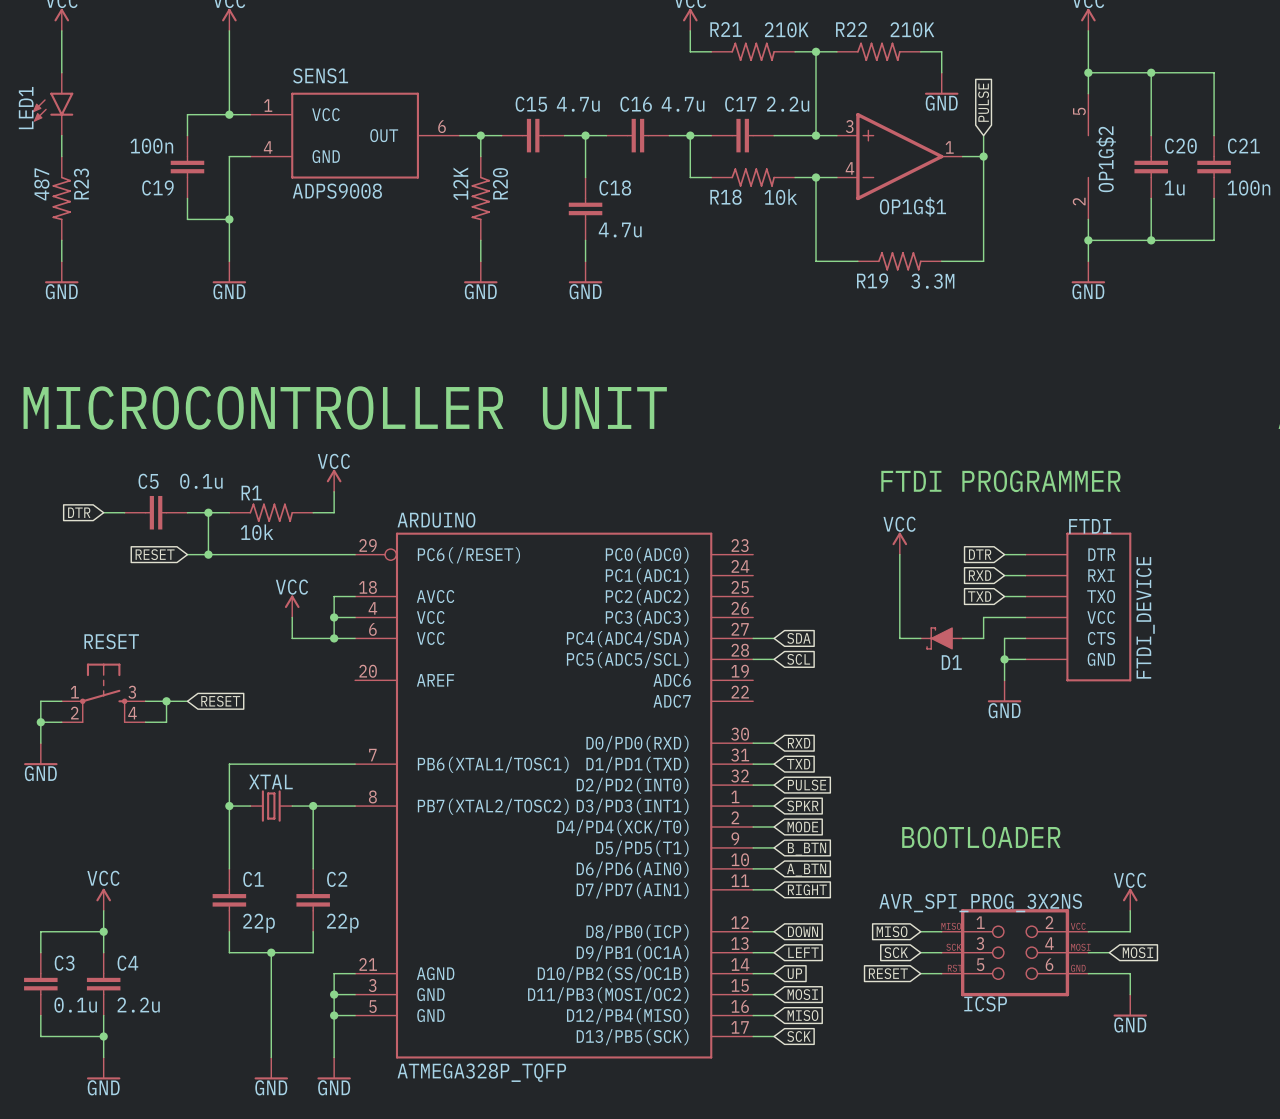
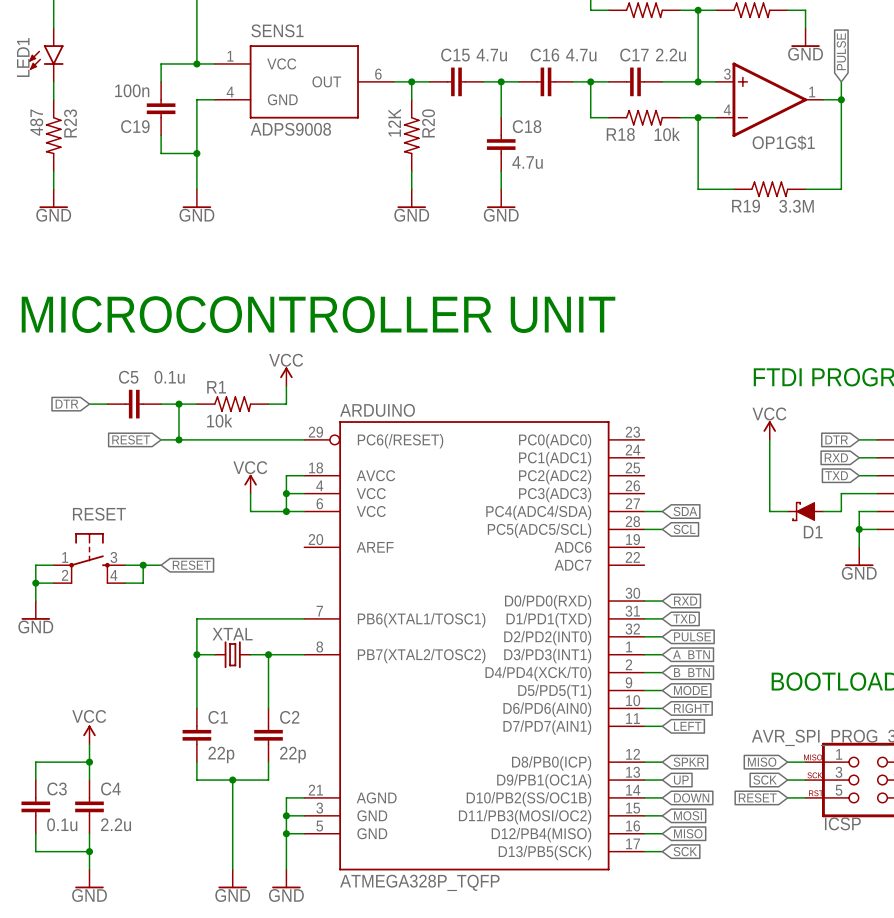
global label: SPKR (802, 806) -> A_BTN (691, 656)
global label: MODE (802, 826) -> B_BTN (691, 673)
global label: B_BTN (806, 849) -> MODE (690, 690)
global label: A_BTN (806, 870) -> RIGHT (691, 708)
global label: RIGHT (807, 889) -> LEFT (687, 726)
global label: DOWN (802, 931) -> SPKR (689, 762)
global label: LEFT (803, 952) -> UP (681, 780)
global label: UP (794, 973) -> DOWN (691, 797)

